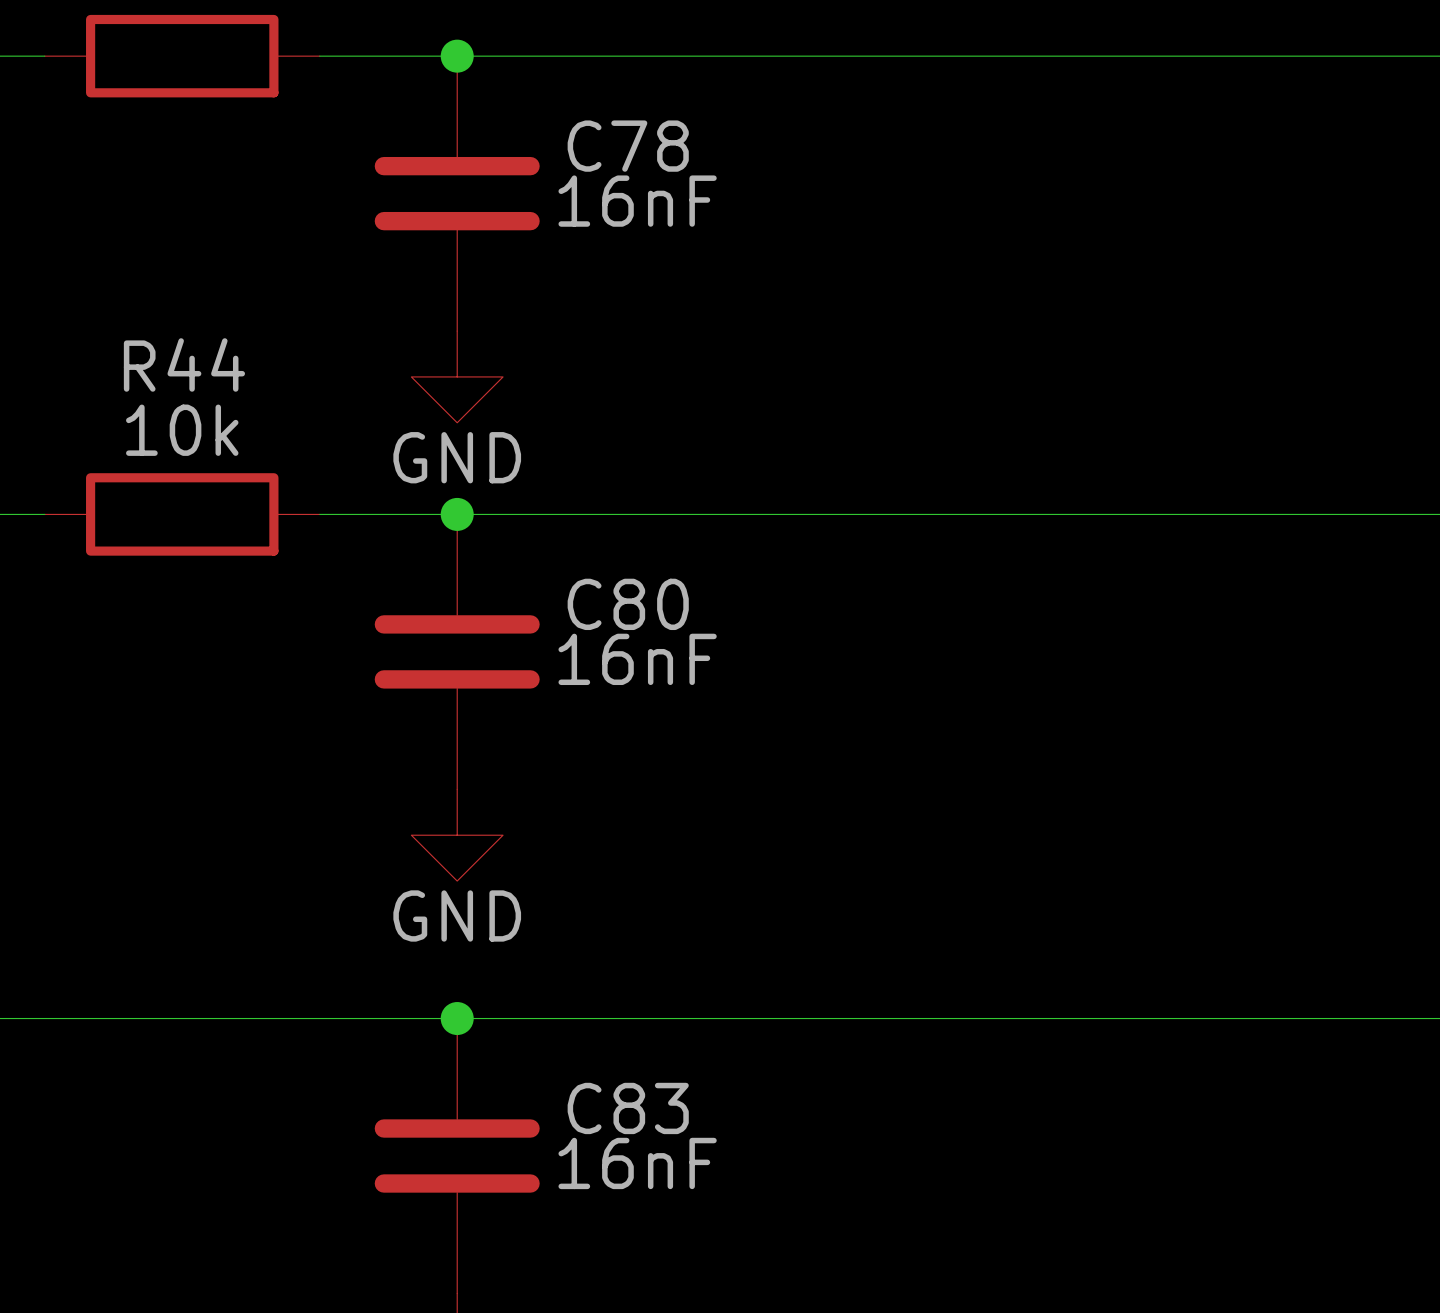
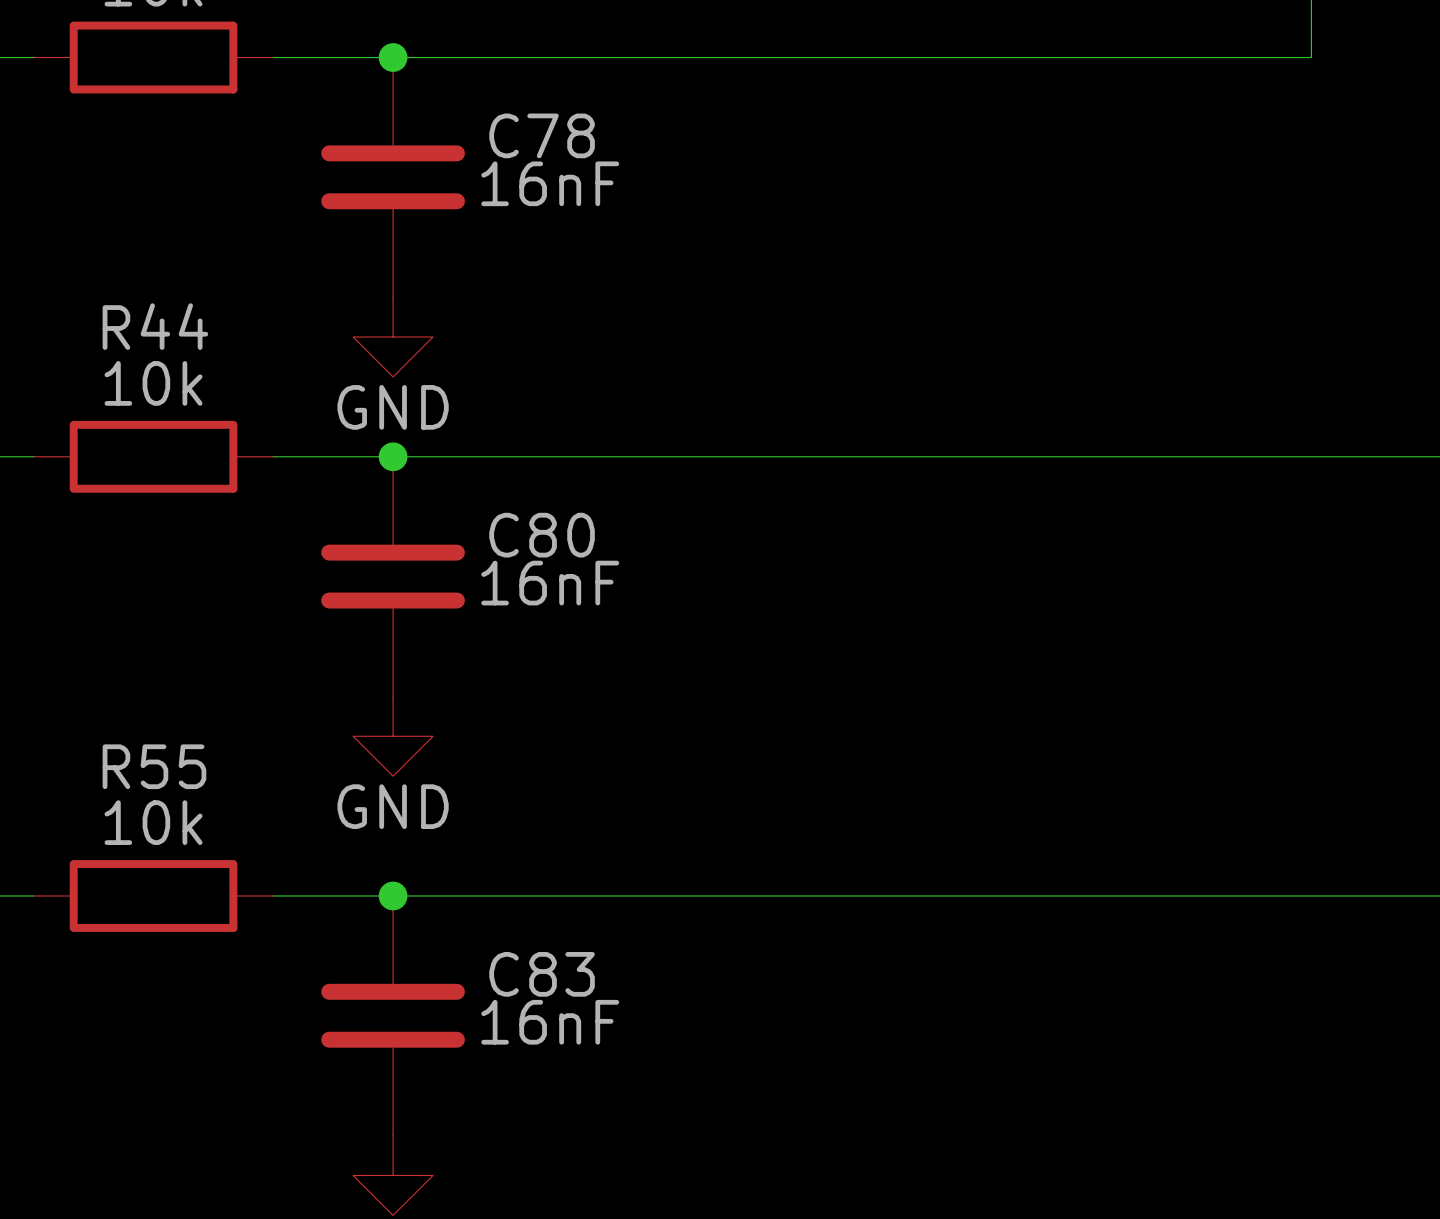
wire: (44, 1018) (319, 1018) -> none
R55: none -> 10k (153, 895)

